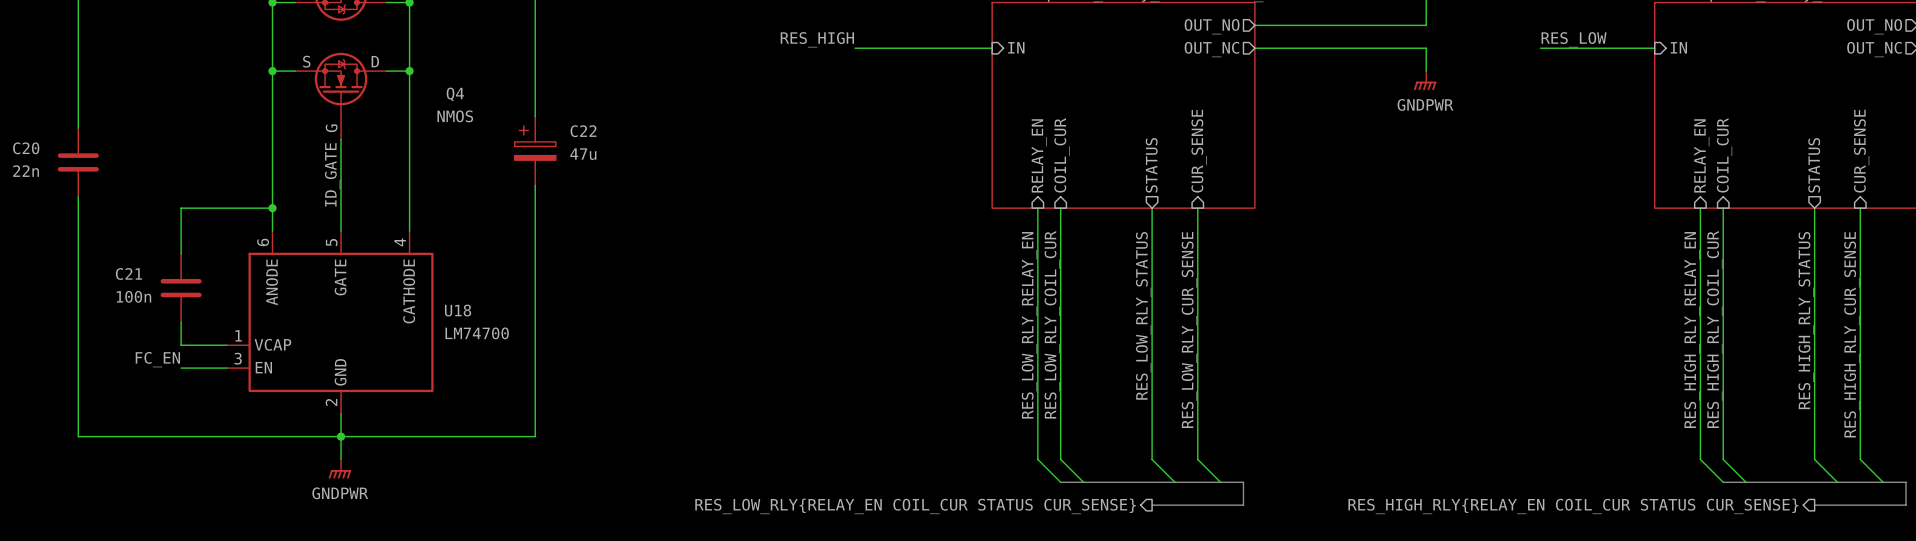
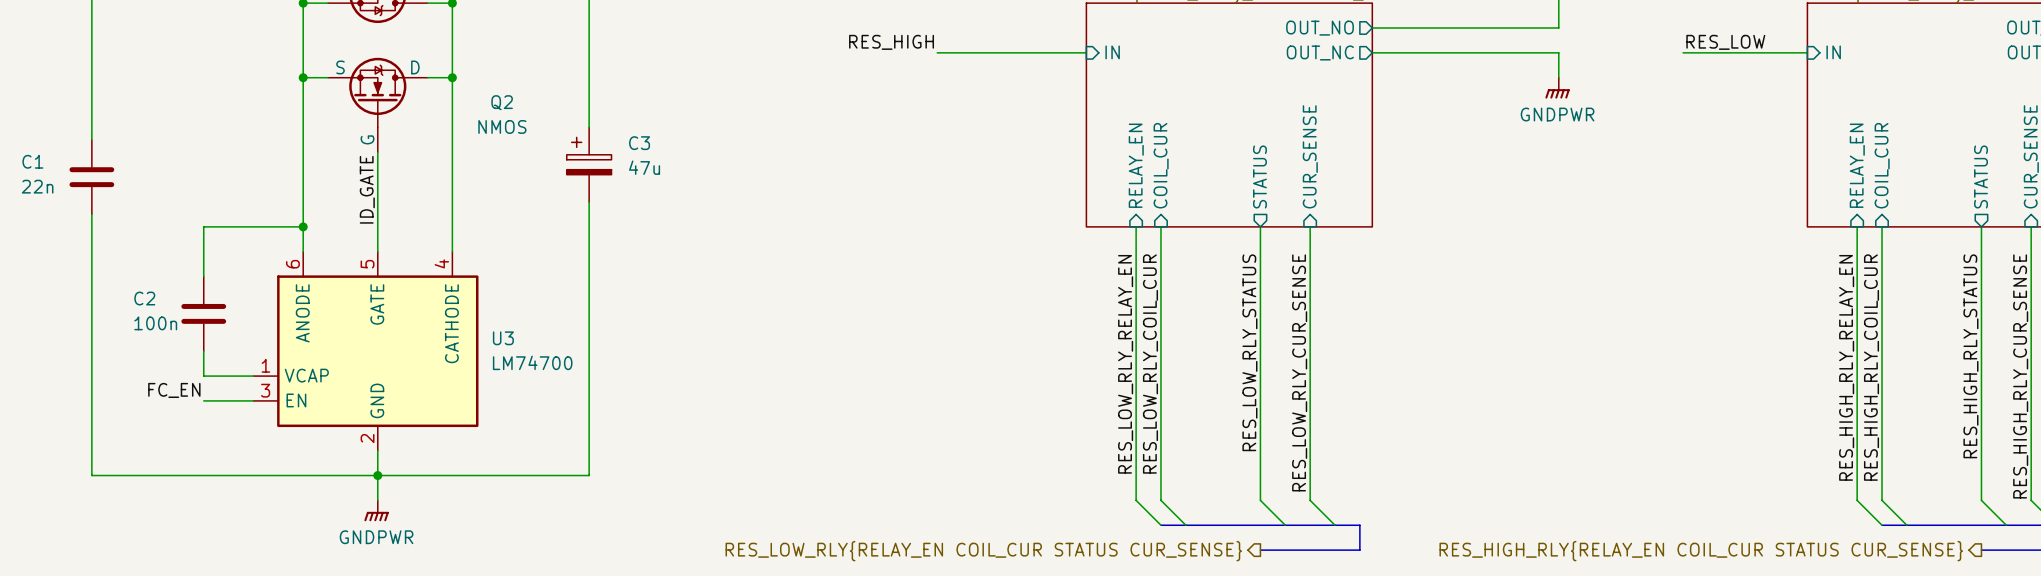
Q4 name: Q4 (455, 94) -> Q2 (502, 102)
C22 name: C22 (583, 131) -> C3 (639, 143)
C20 name: C20 (26, 148) -> C1 (32, 161)
C21 name: C21 (129, 273) -> C2 (144, 298)
U18 name: U18 (458, 310) -> U3 (503, 338)

